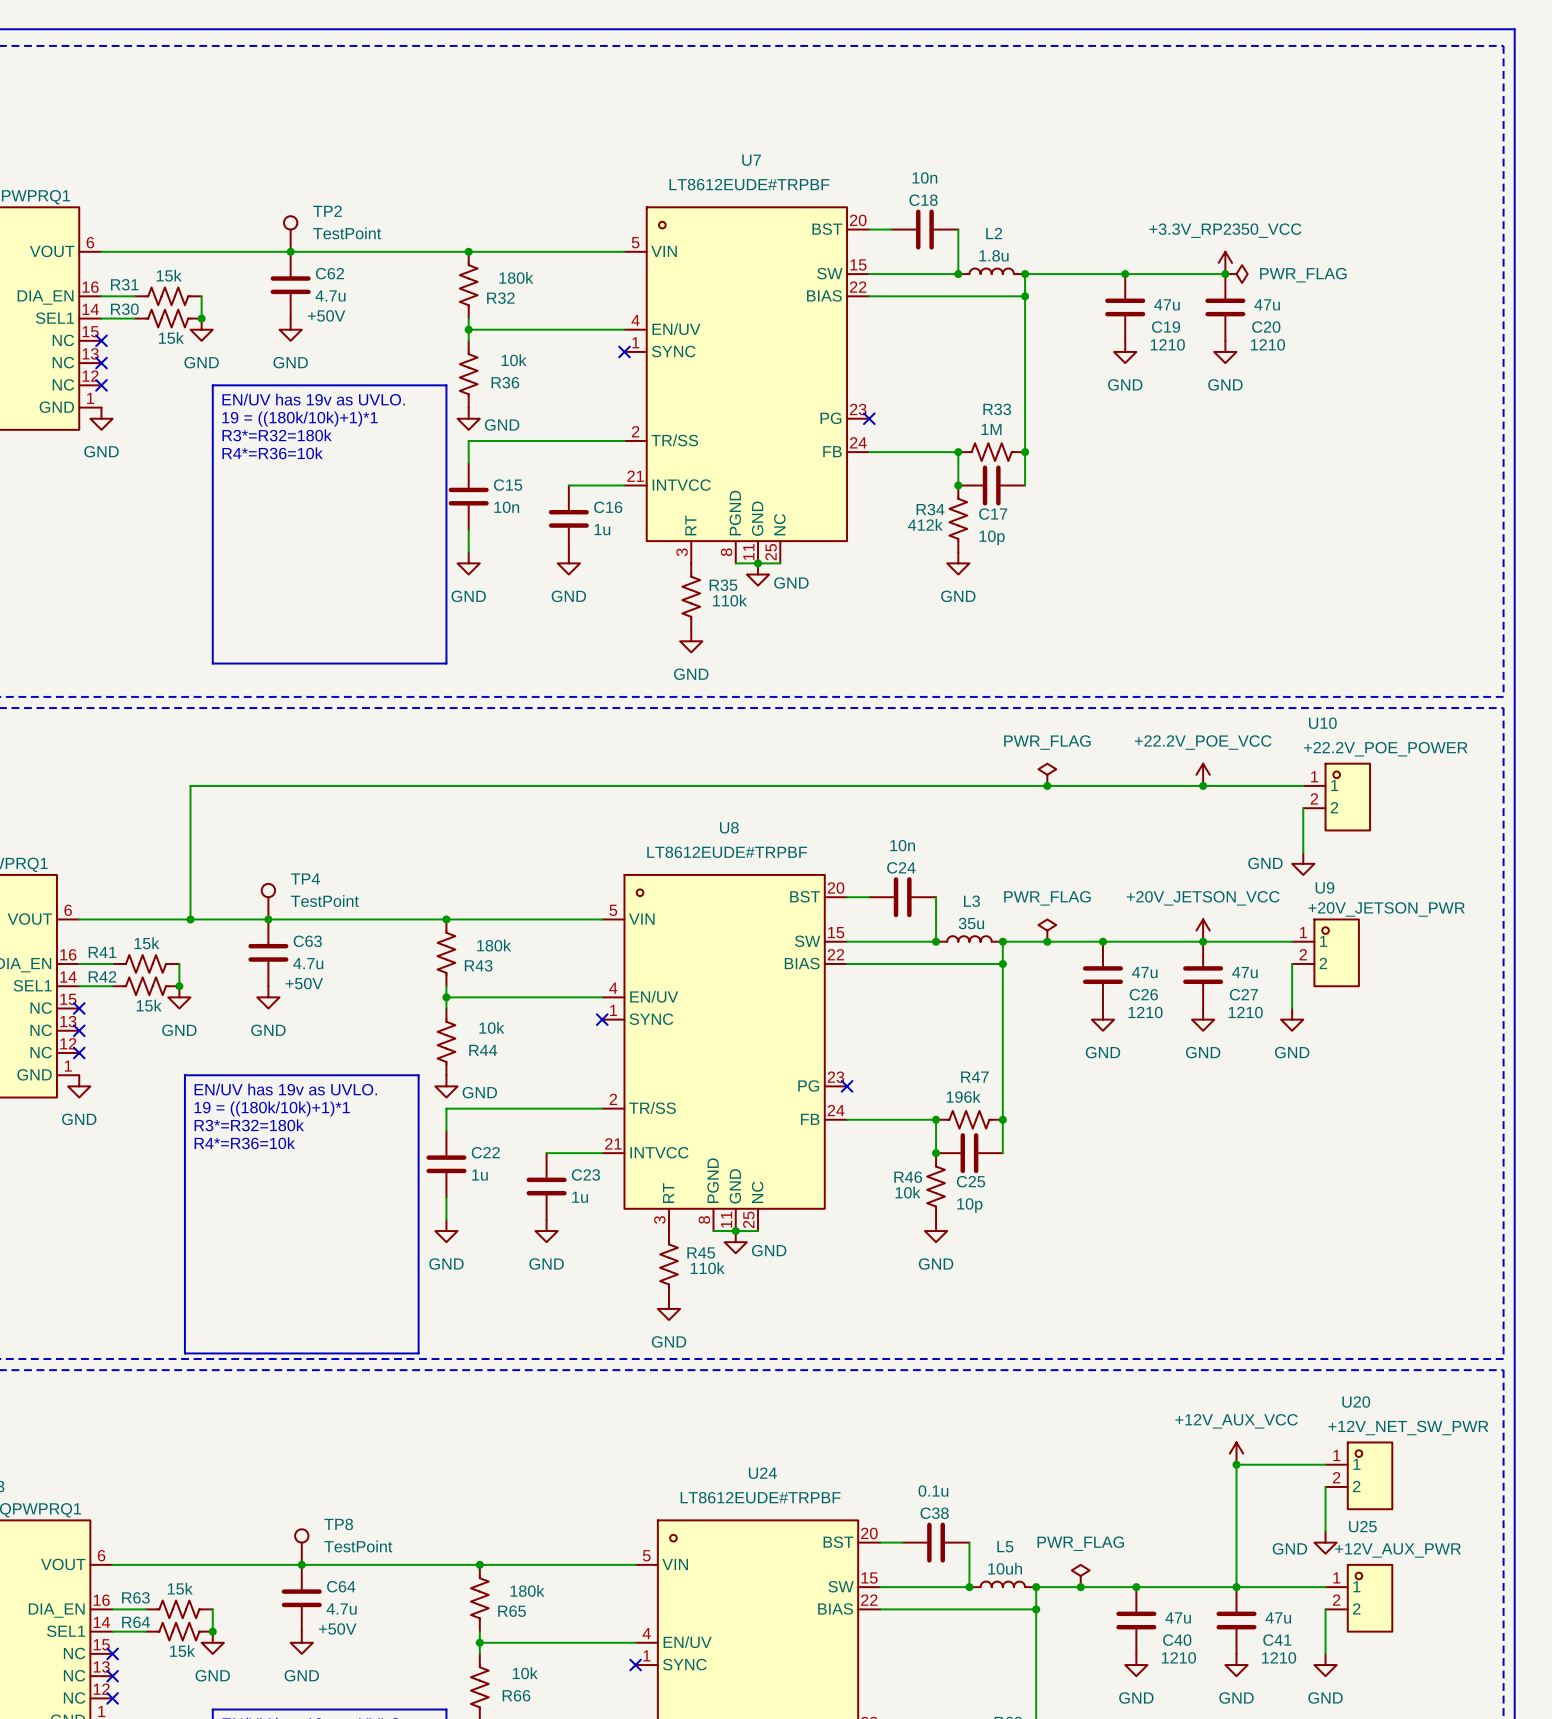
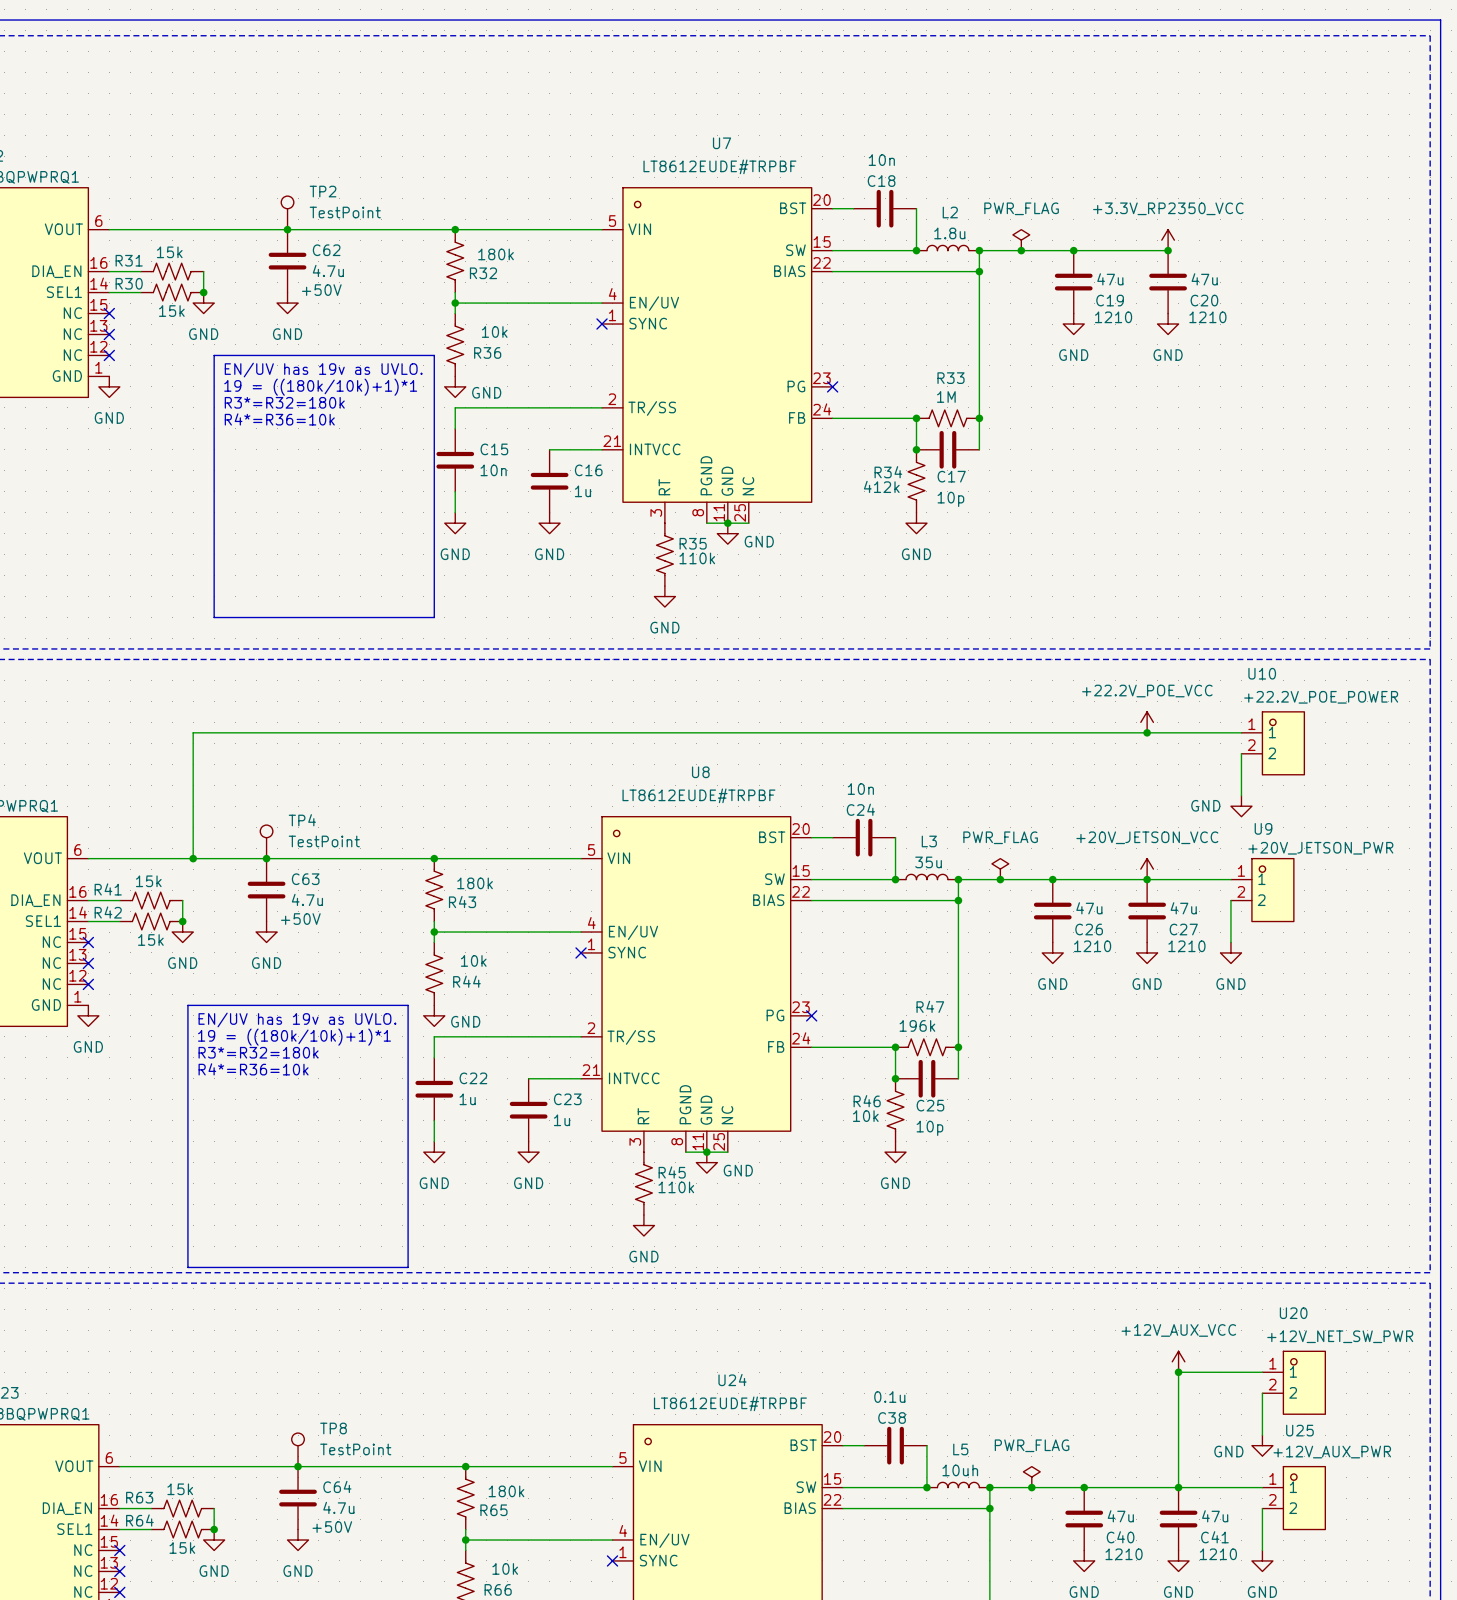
junction: none -> (1021, 250)
power symbol rotation: 0° (1236, 274) -> 90° counterclockwise (1021, 240)
power symbol position: PWR_FLAG (1236, 274) -> PWR_FLAG (1021, 240)
power symbol text position: PWR_FLAG (1303, 275) -> PWR_FLAG (1021, 208)
power symbol: PWR_FLAG (1047, 774) -> none
junction: (1047, 785) -> none

